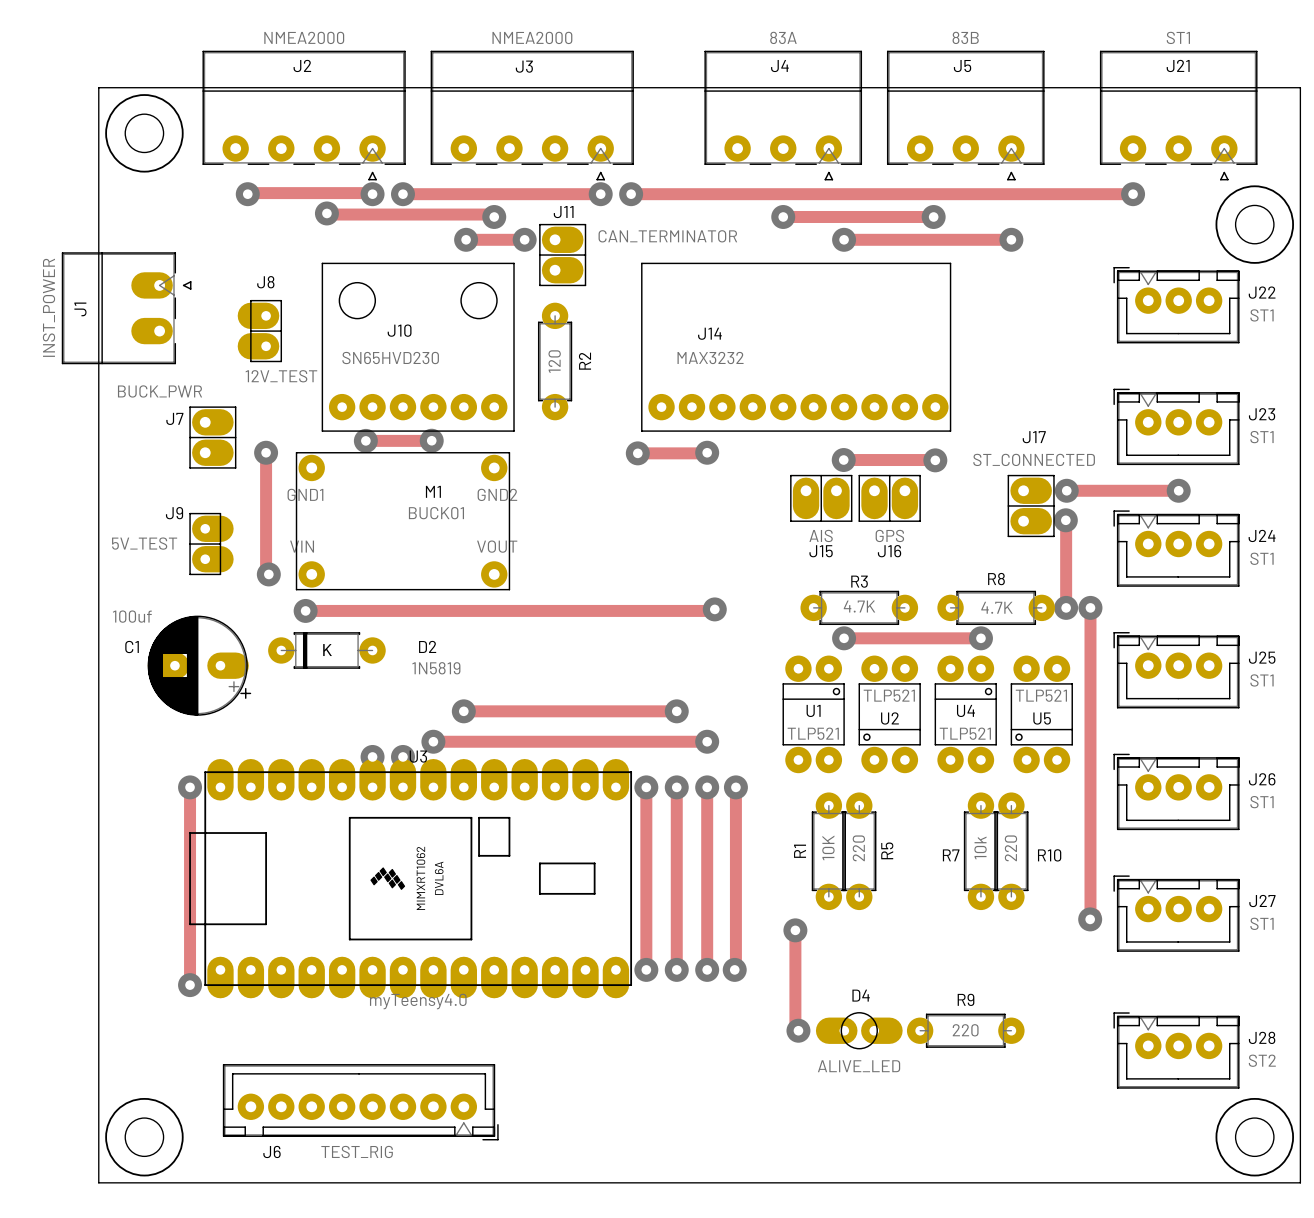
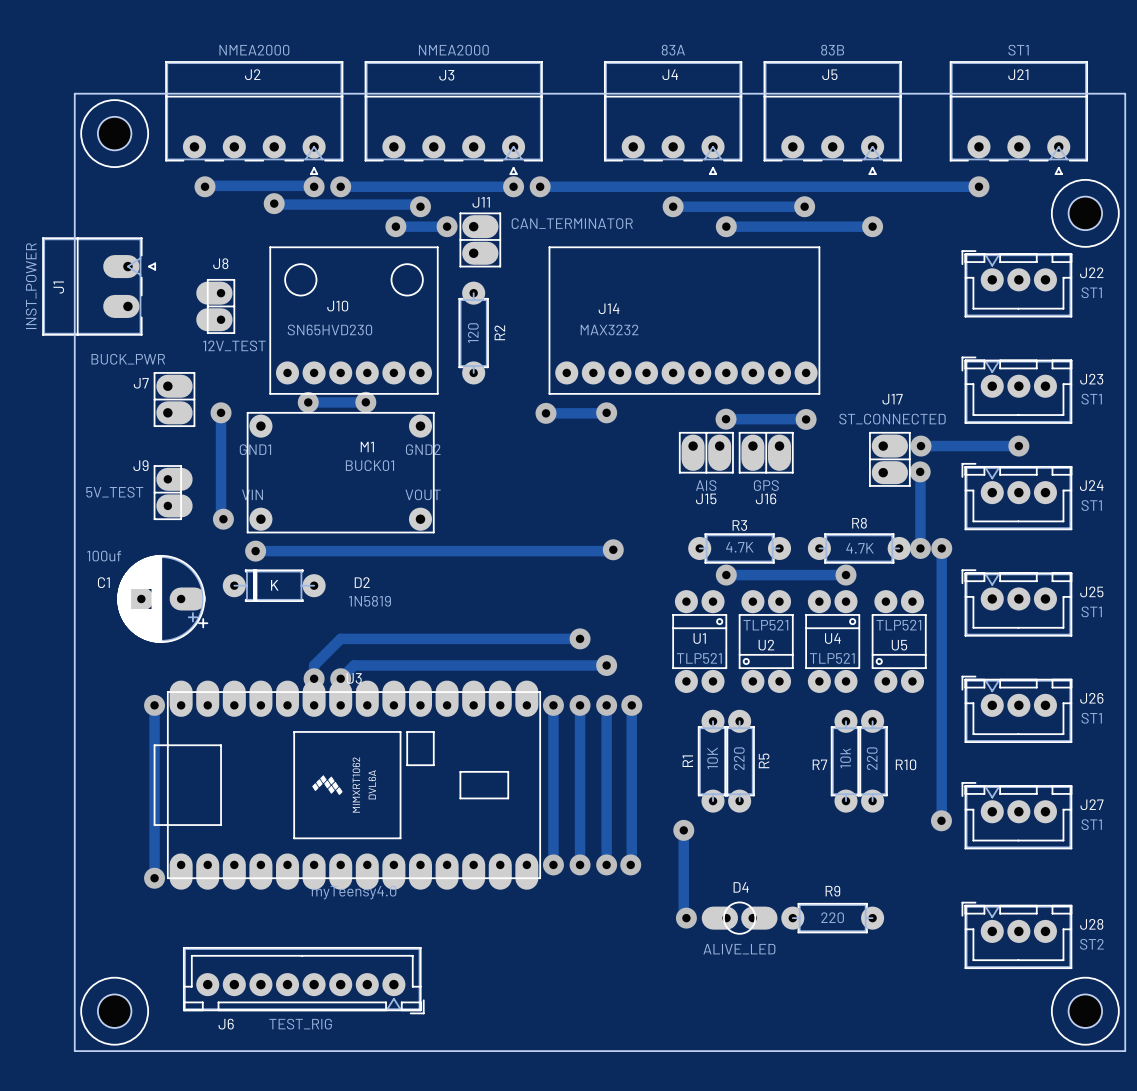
track: none -> (393, 638) (340, 638) (314, 665) (314, 678)
via: (463, 711) -> none
track: none -> (367, 665) (354, 665) (340, 678)
via: (433, 741) -> none

